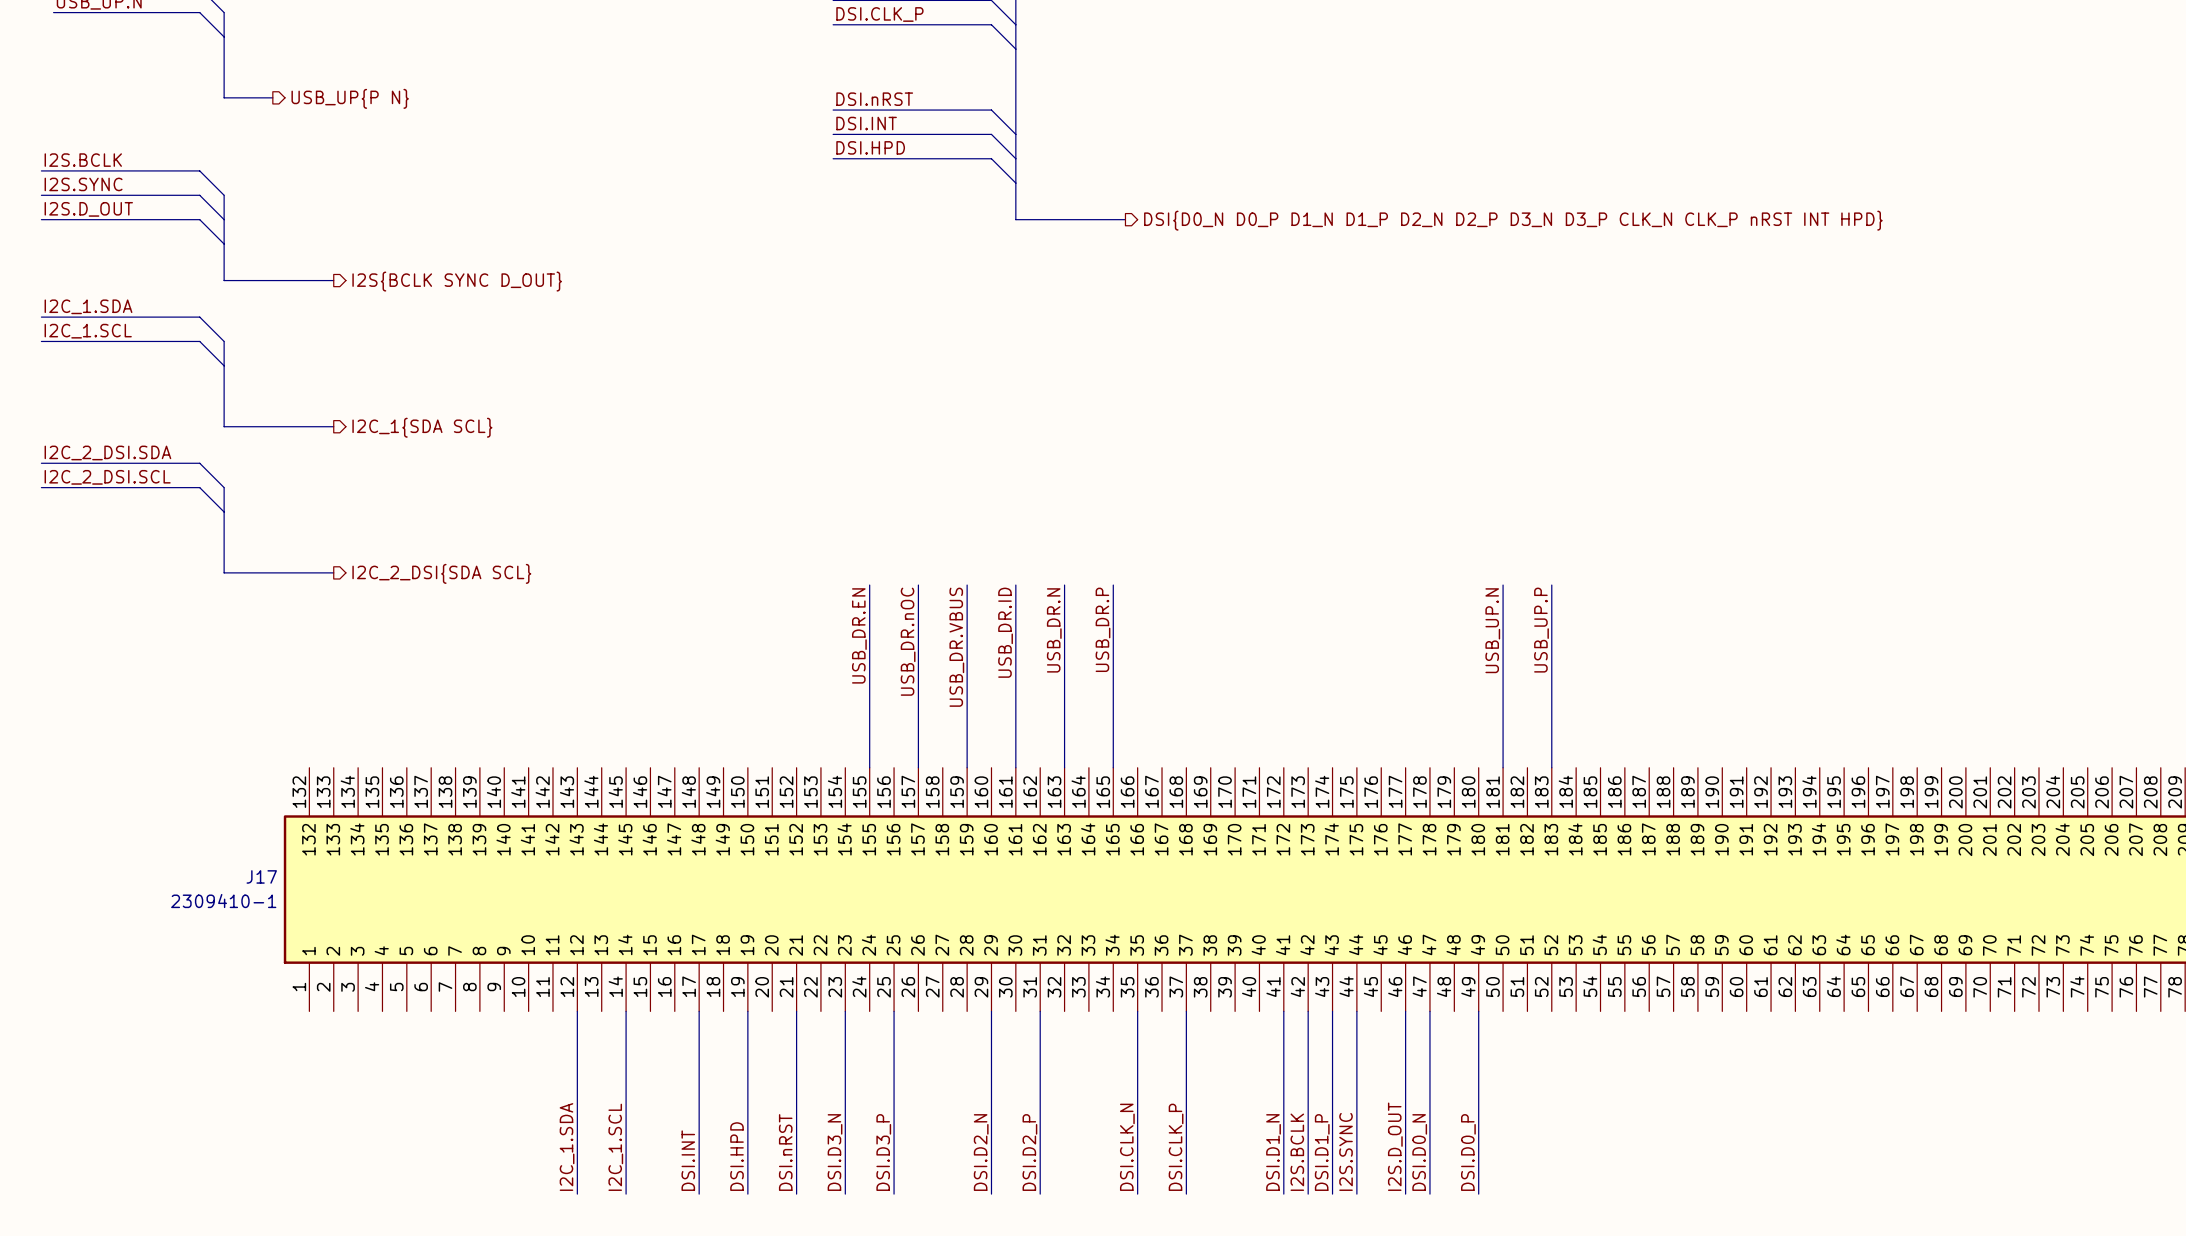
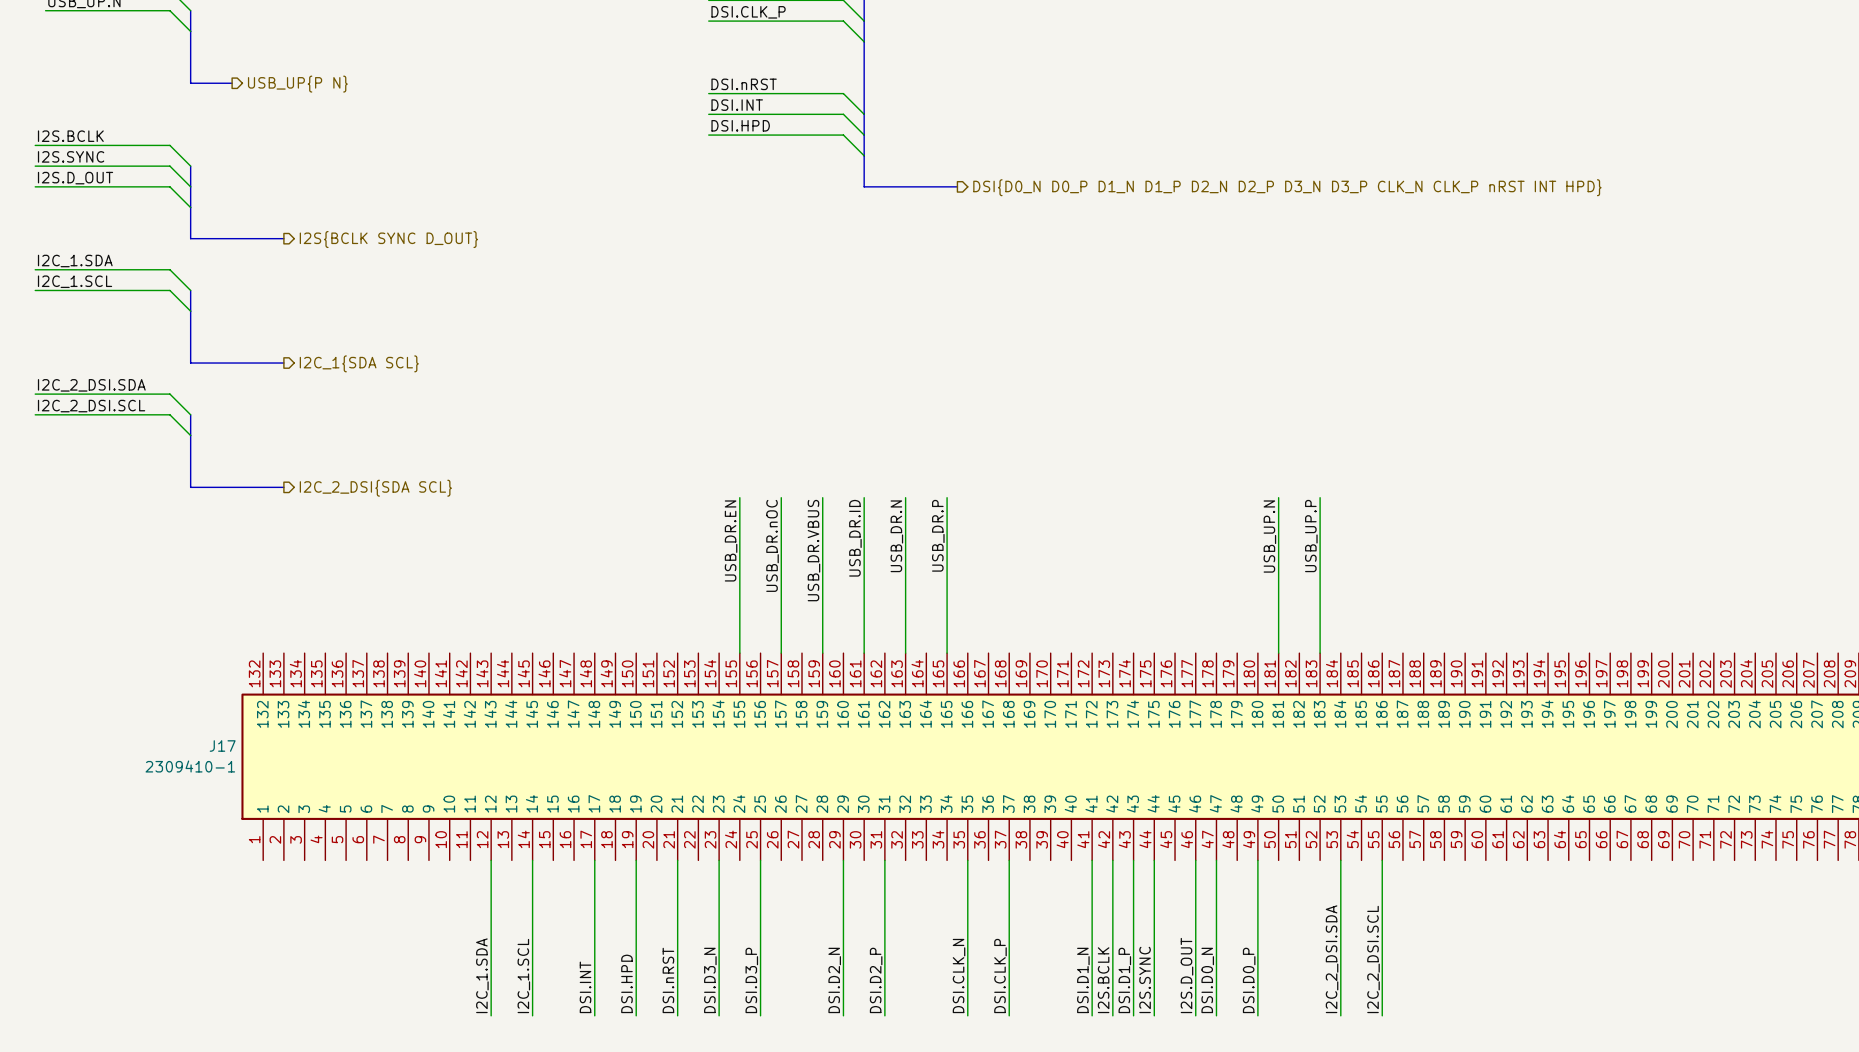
wire: none -> (1340, 860) (1340, 1015)
wire: none -> (1382, 860) (1382, 1015)
label: none -> I2C_2_DSI.SDA (1332, 959)
label: none -> I2C_2_DSI.SCL (1373, 959)

